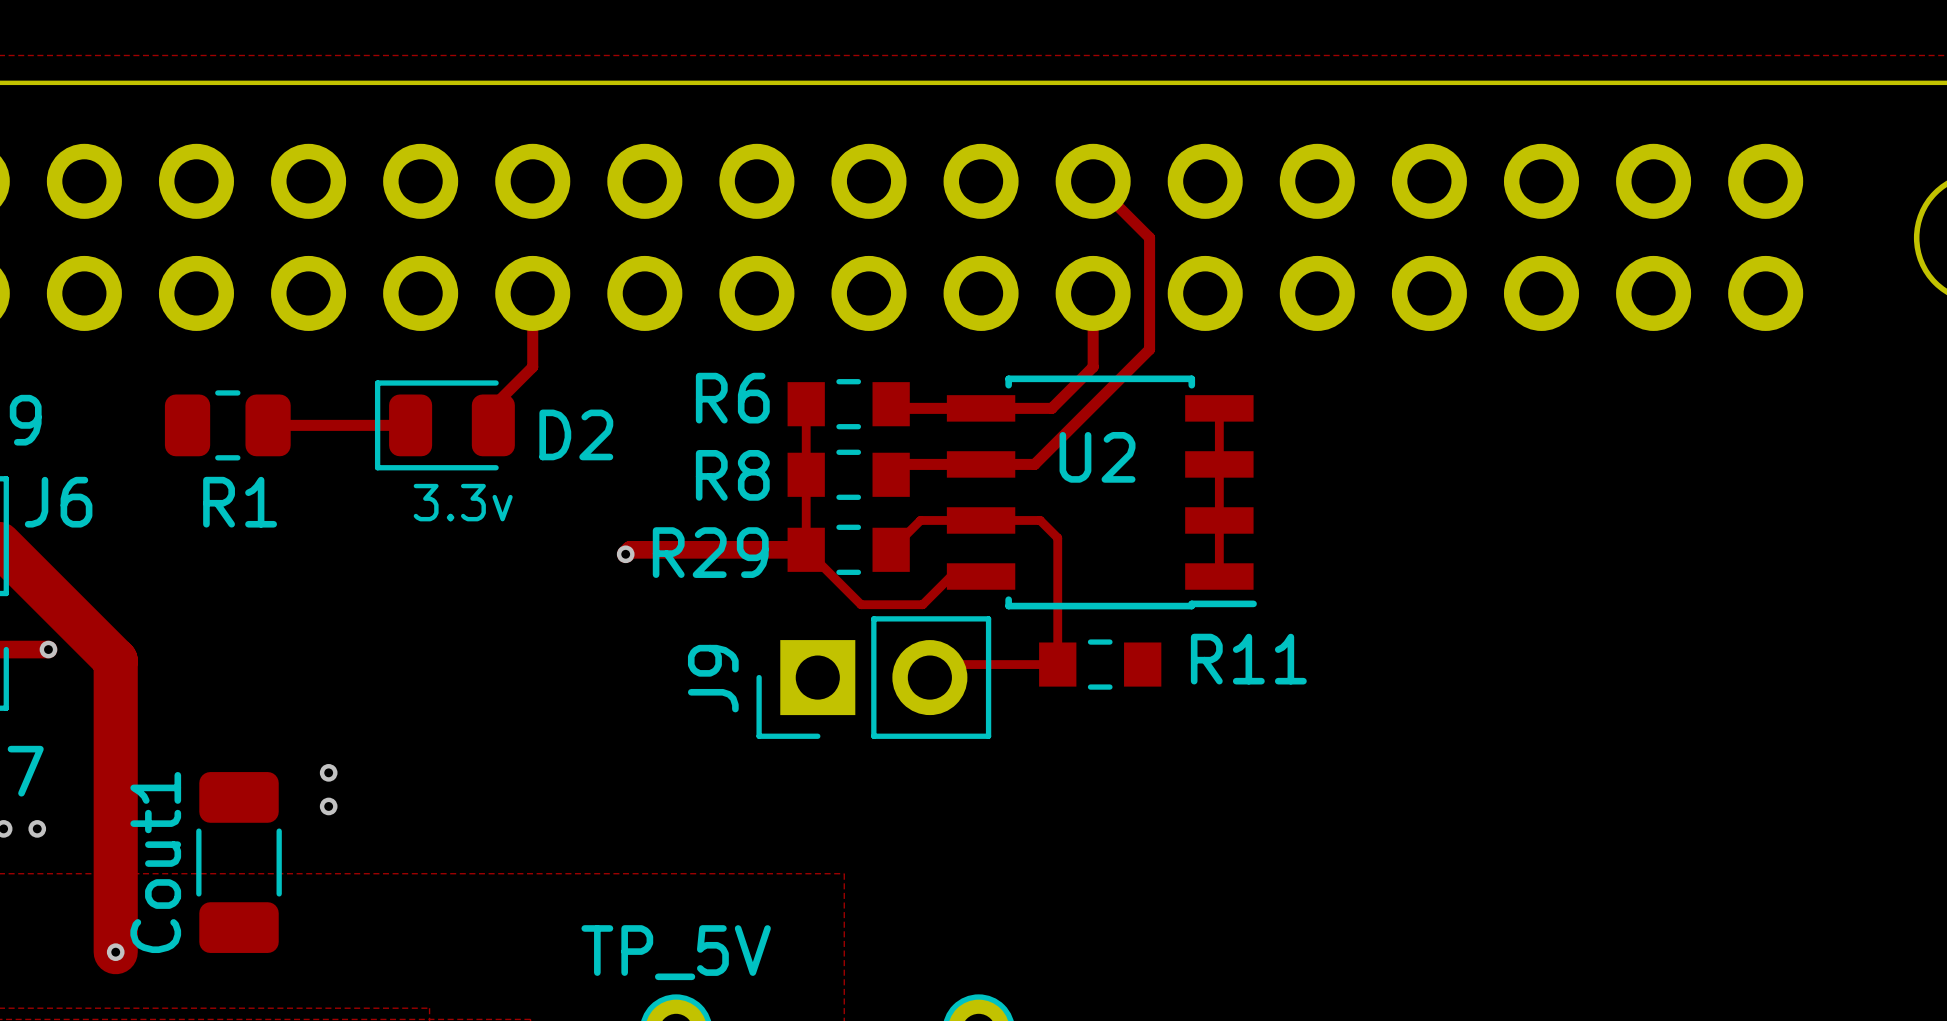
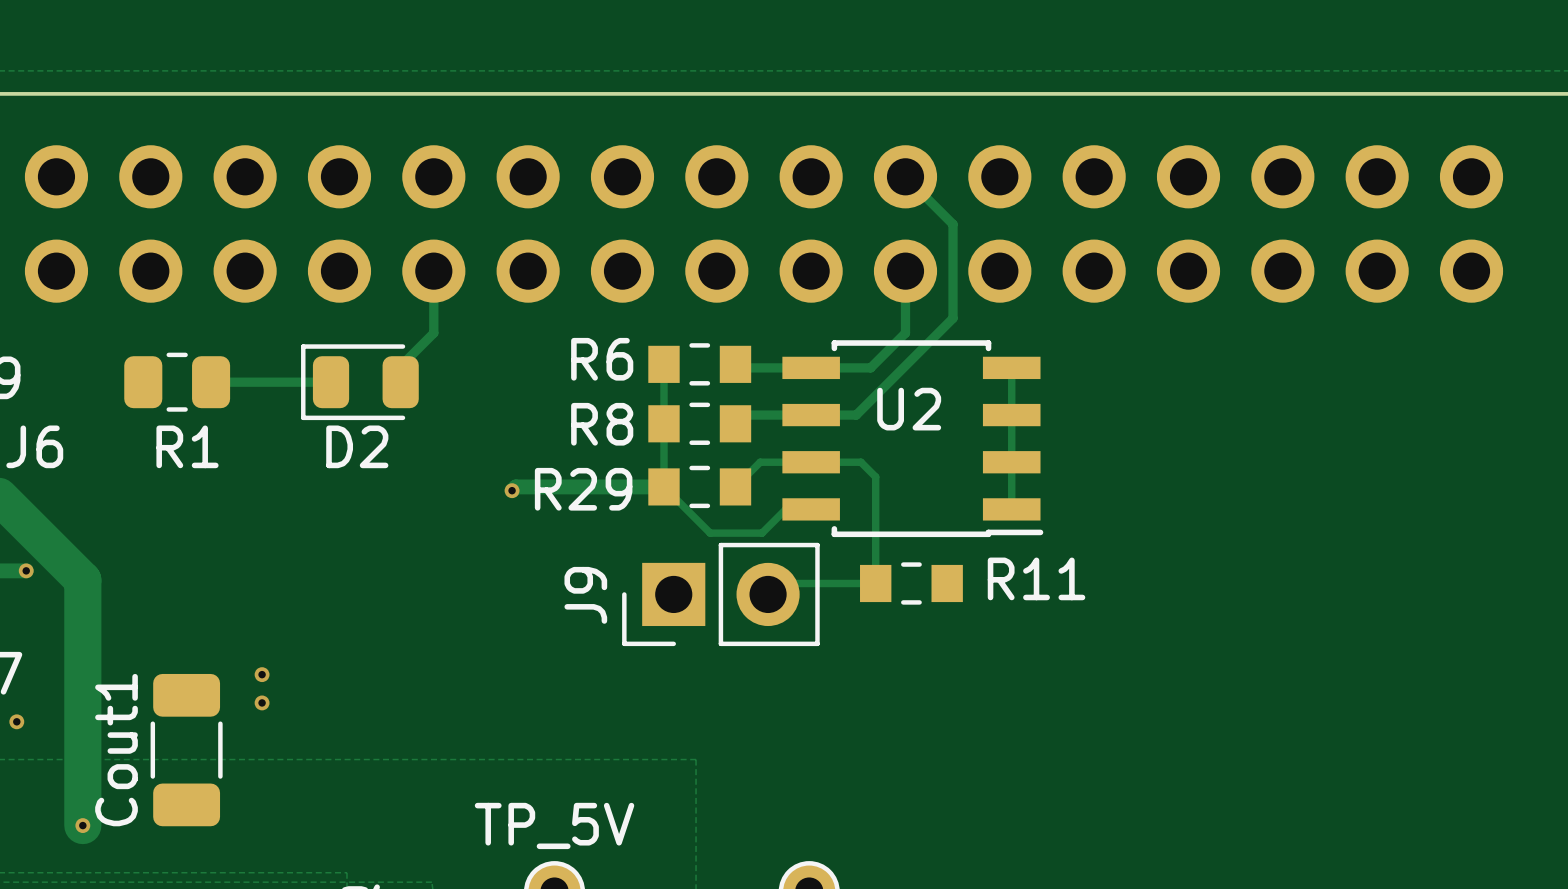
D2 name position: D2 (576, 434) -> D2 (357, 446)
text: 3.3v (463, 502) -> none

